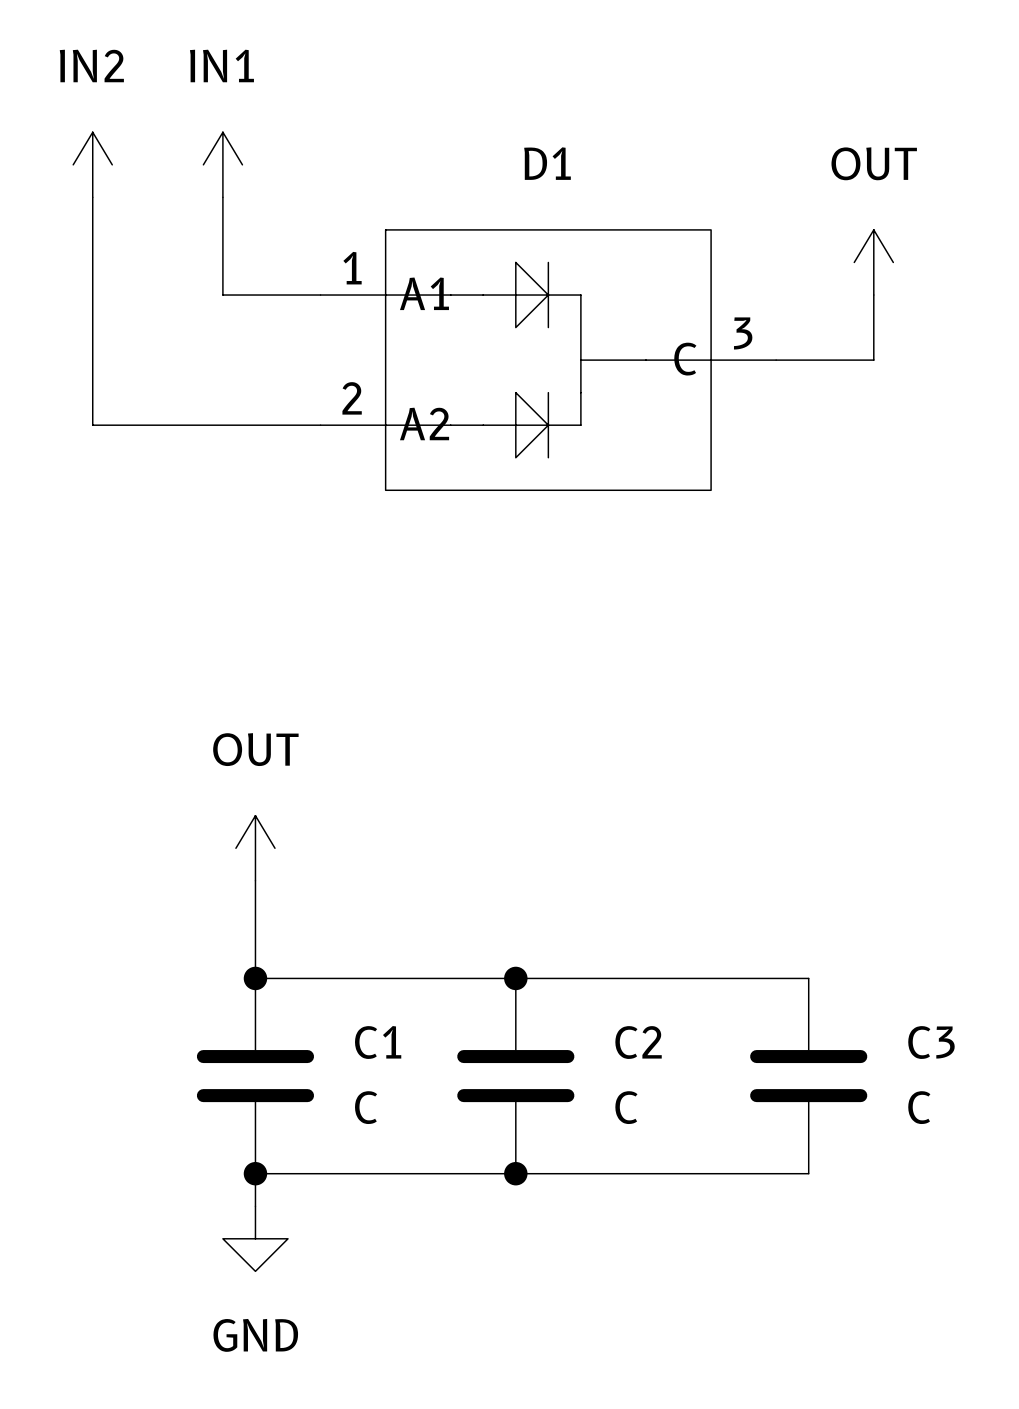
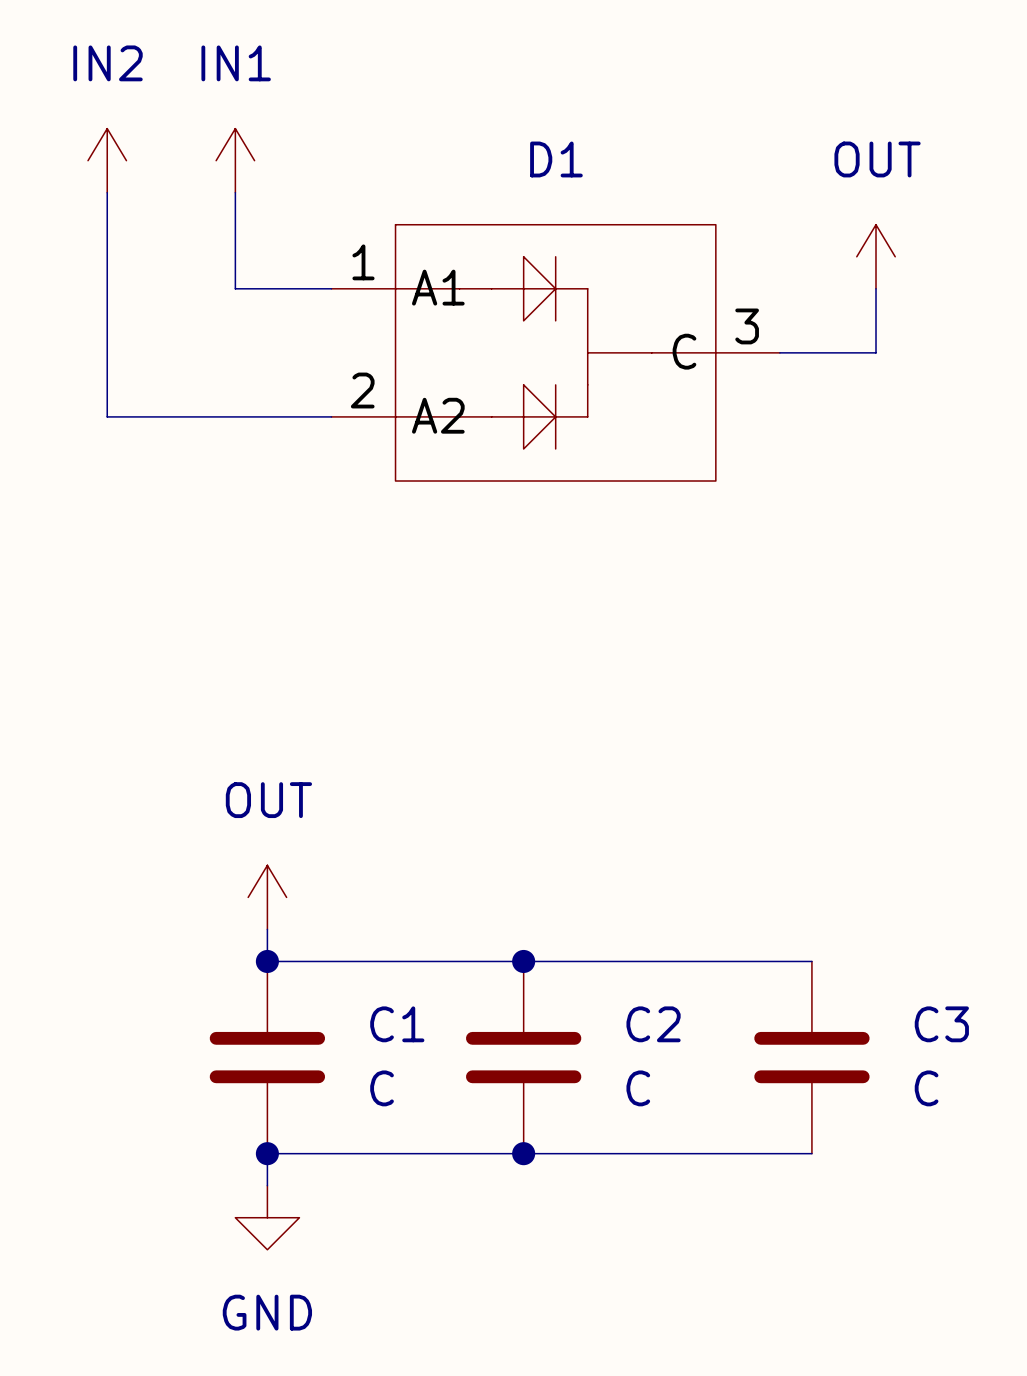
power symbol position: OUT (255, 848) -> OUT (267, 897)

